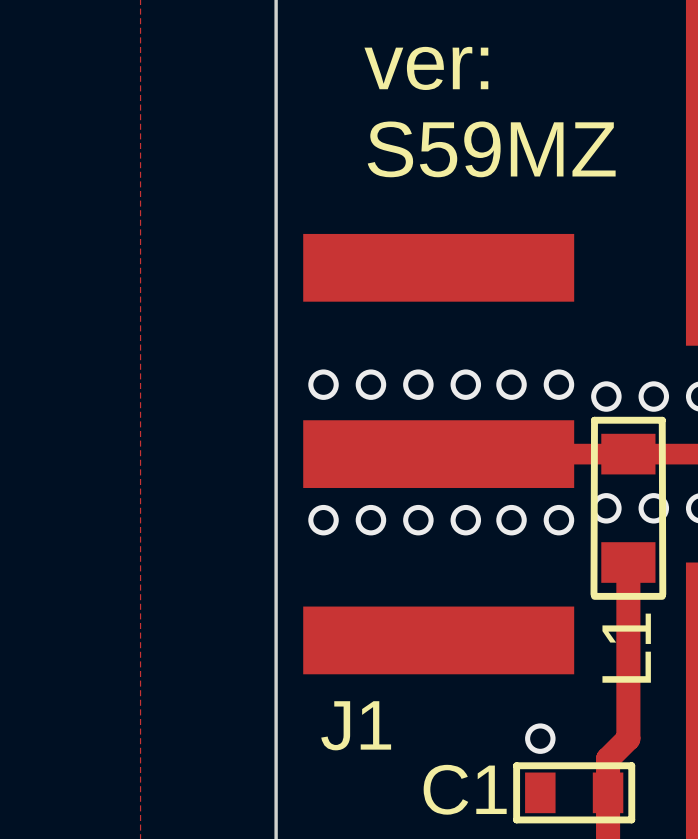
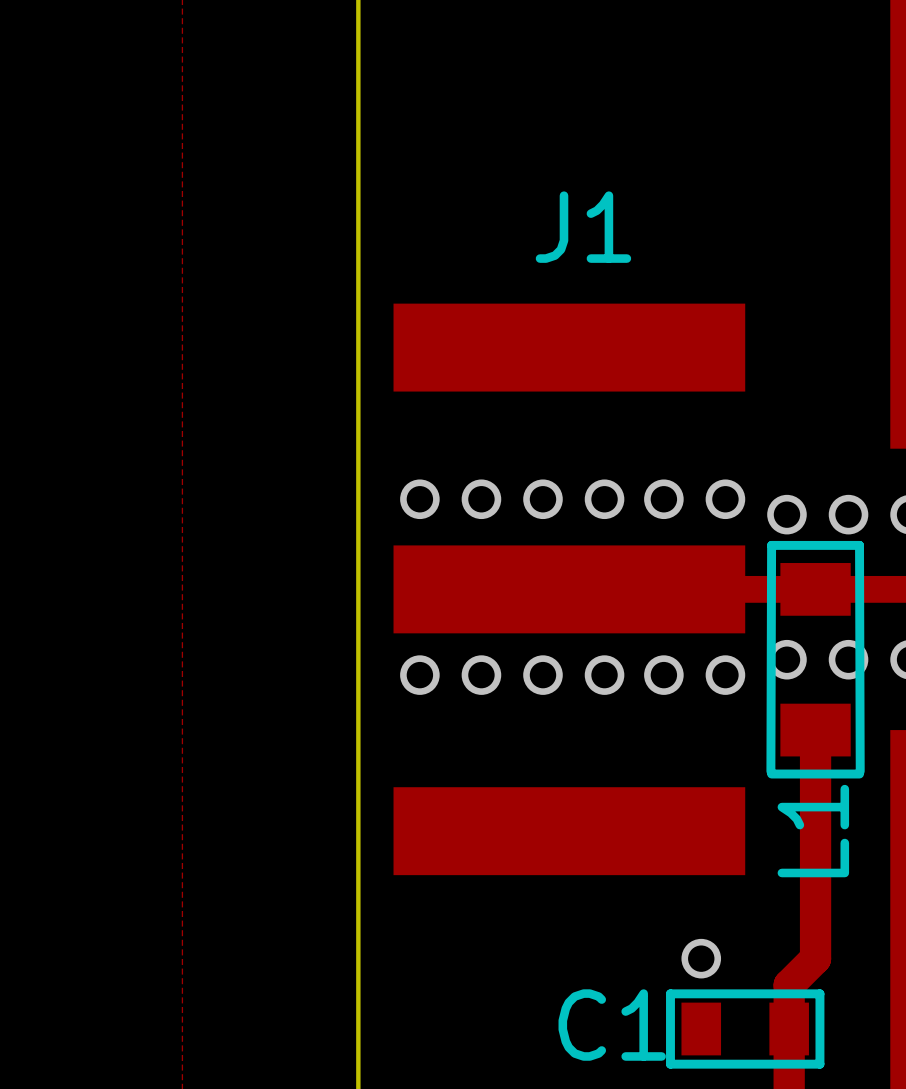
text: ver: (426, 68) -> none
text: S59MZ (491, 149) -> none
J1 name position: J1 (356, 725) -> J1 (583, 227)

